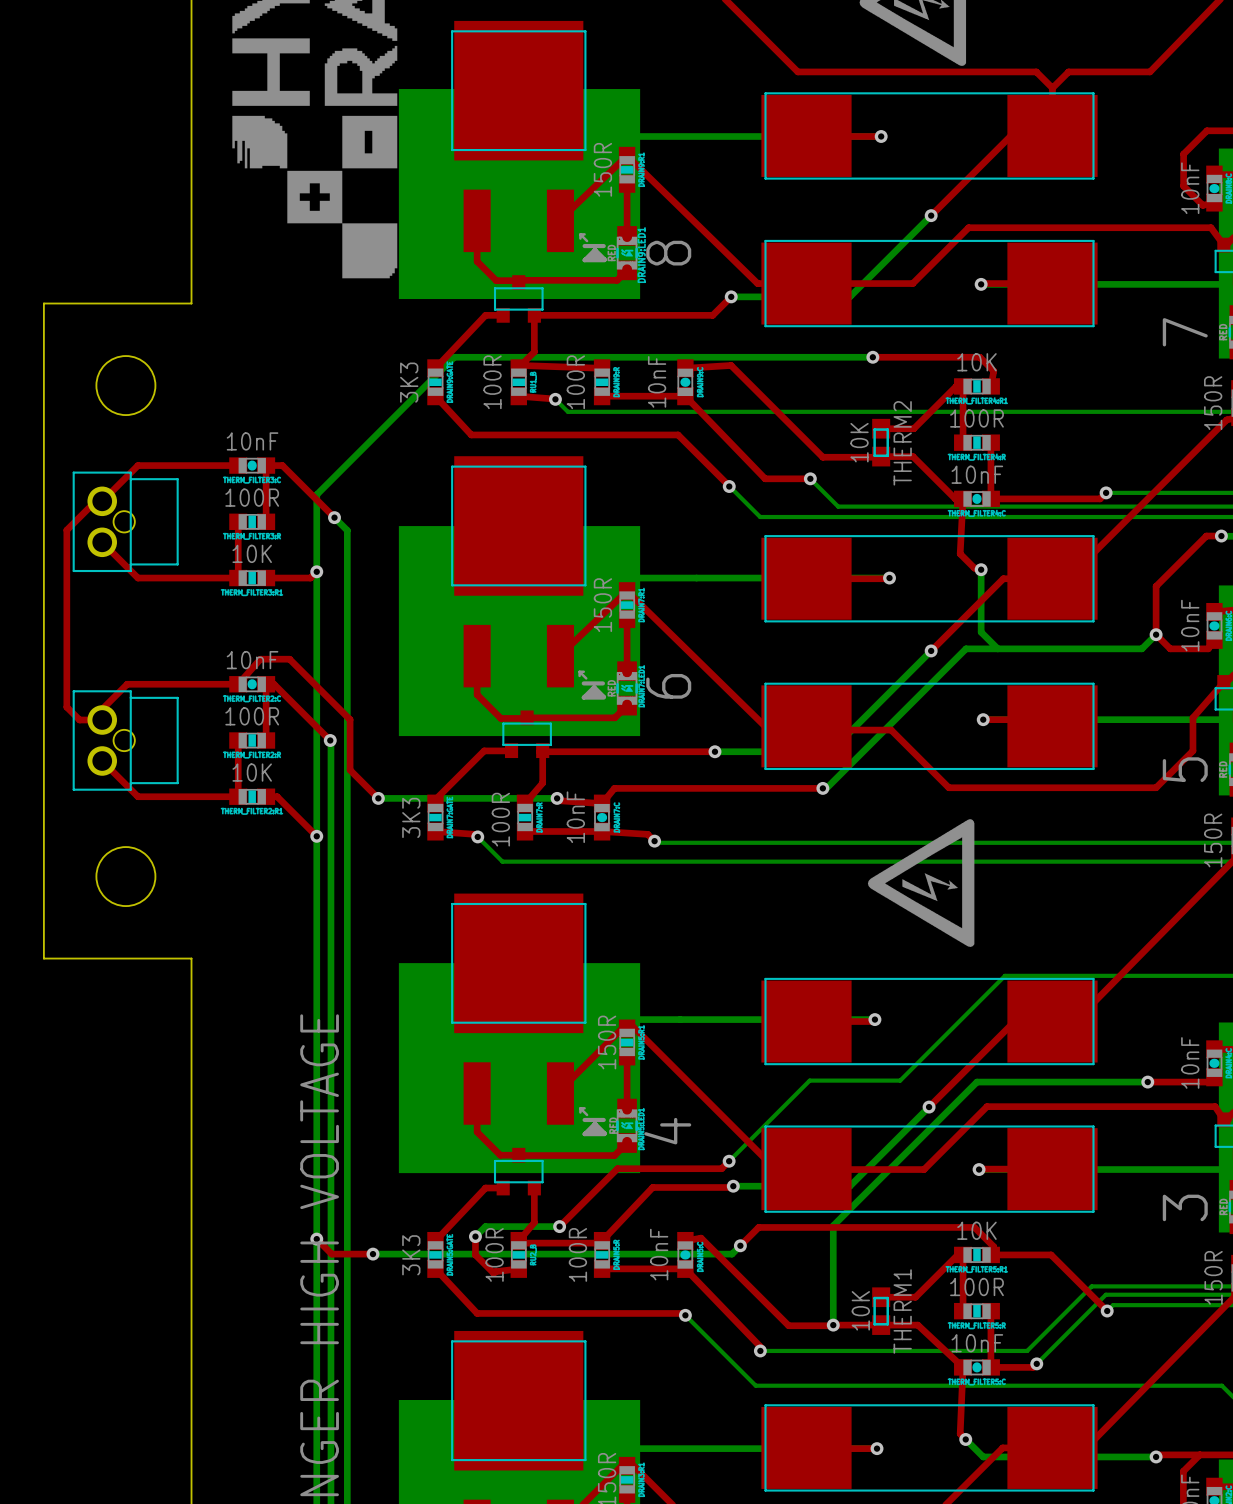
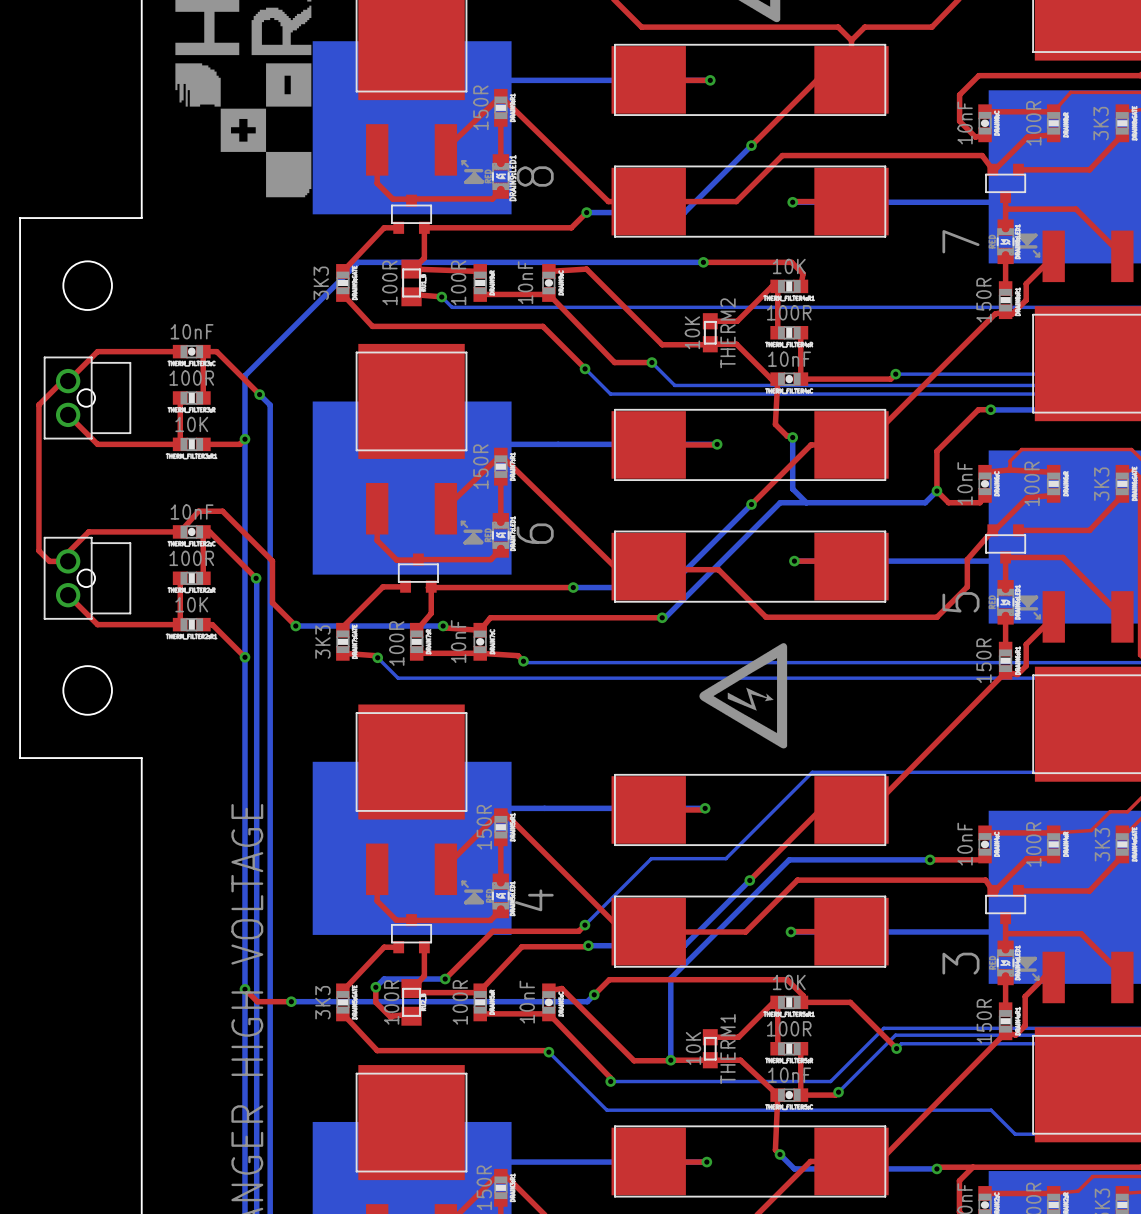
part footprint: [510, 359, 527, 406] -> [401, 259, 422, 307]
part footprint: [510, 1231, 527, 1278] -> [401, 979, 422, 1026]

